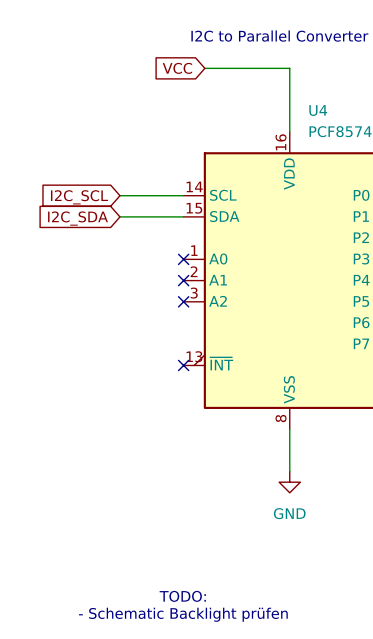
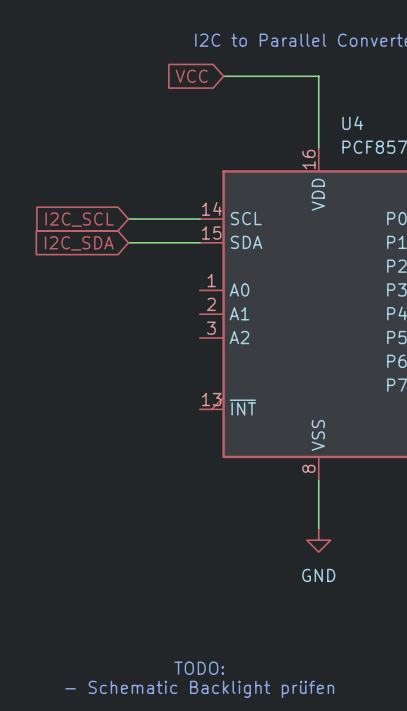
no-connect mark: (183, 259) -> none
no-connect mark: (183, 280) -> none
no-connect mark: (183, 301) -> none
no-connect mark: (183, 365) -> none

